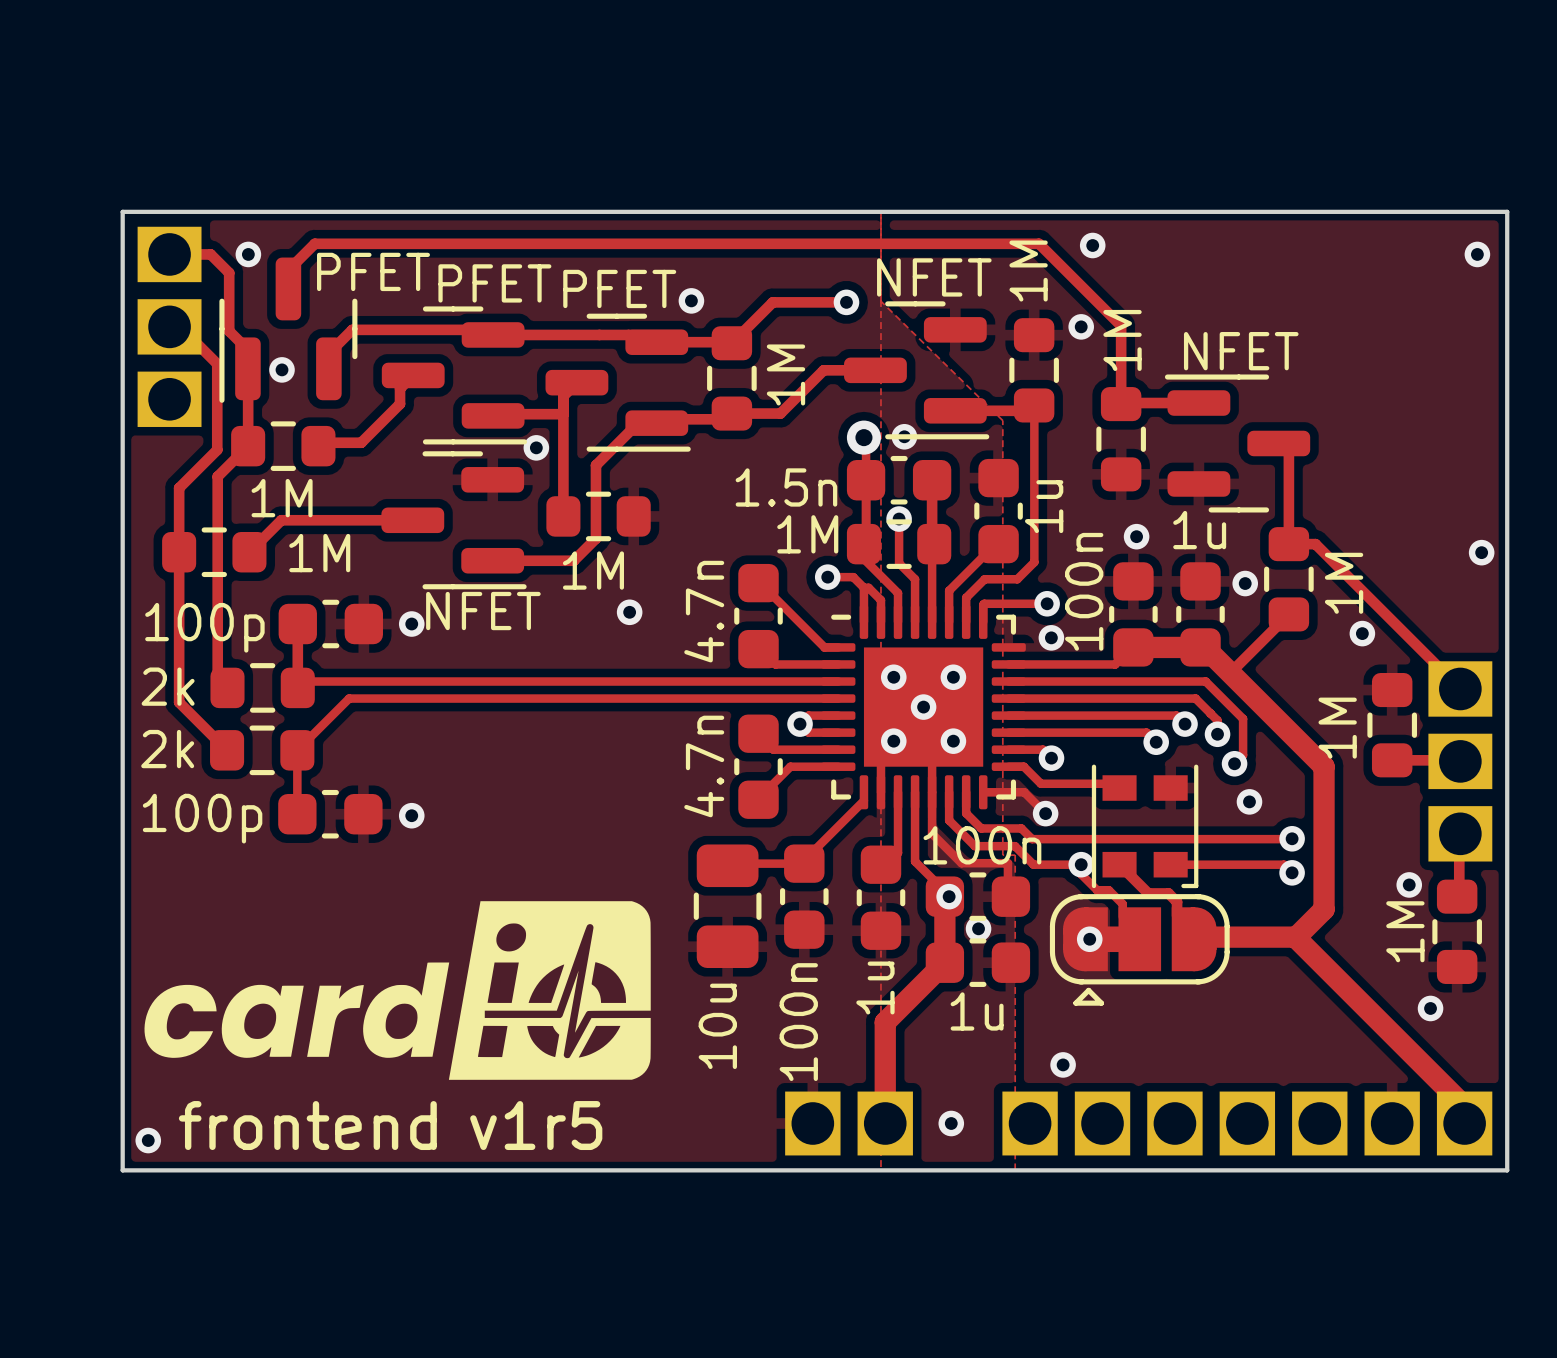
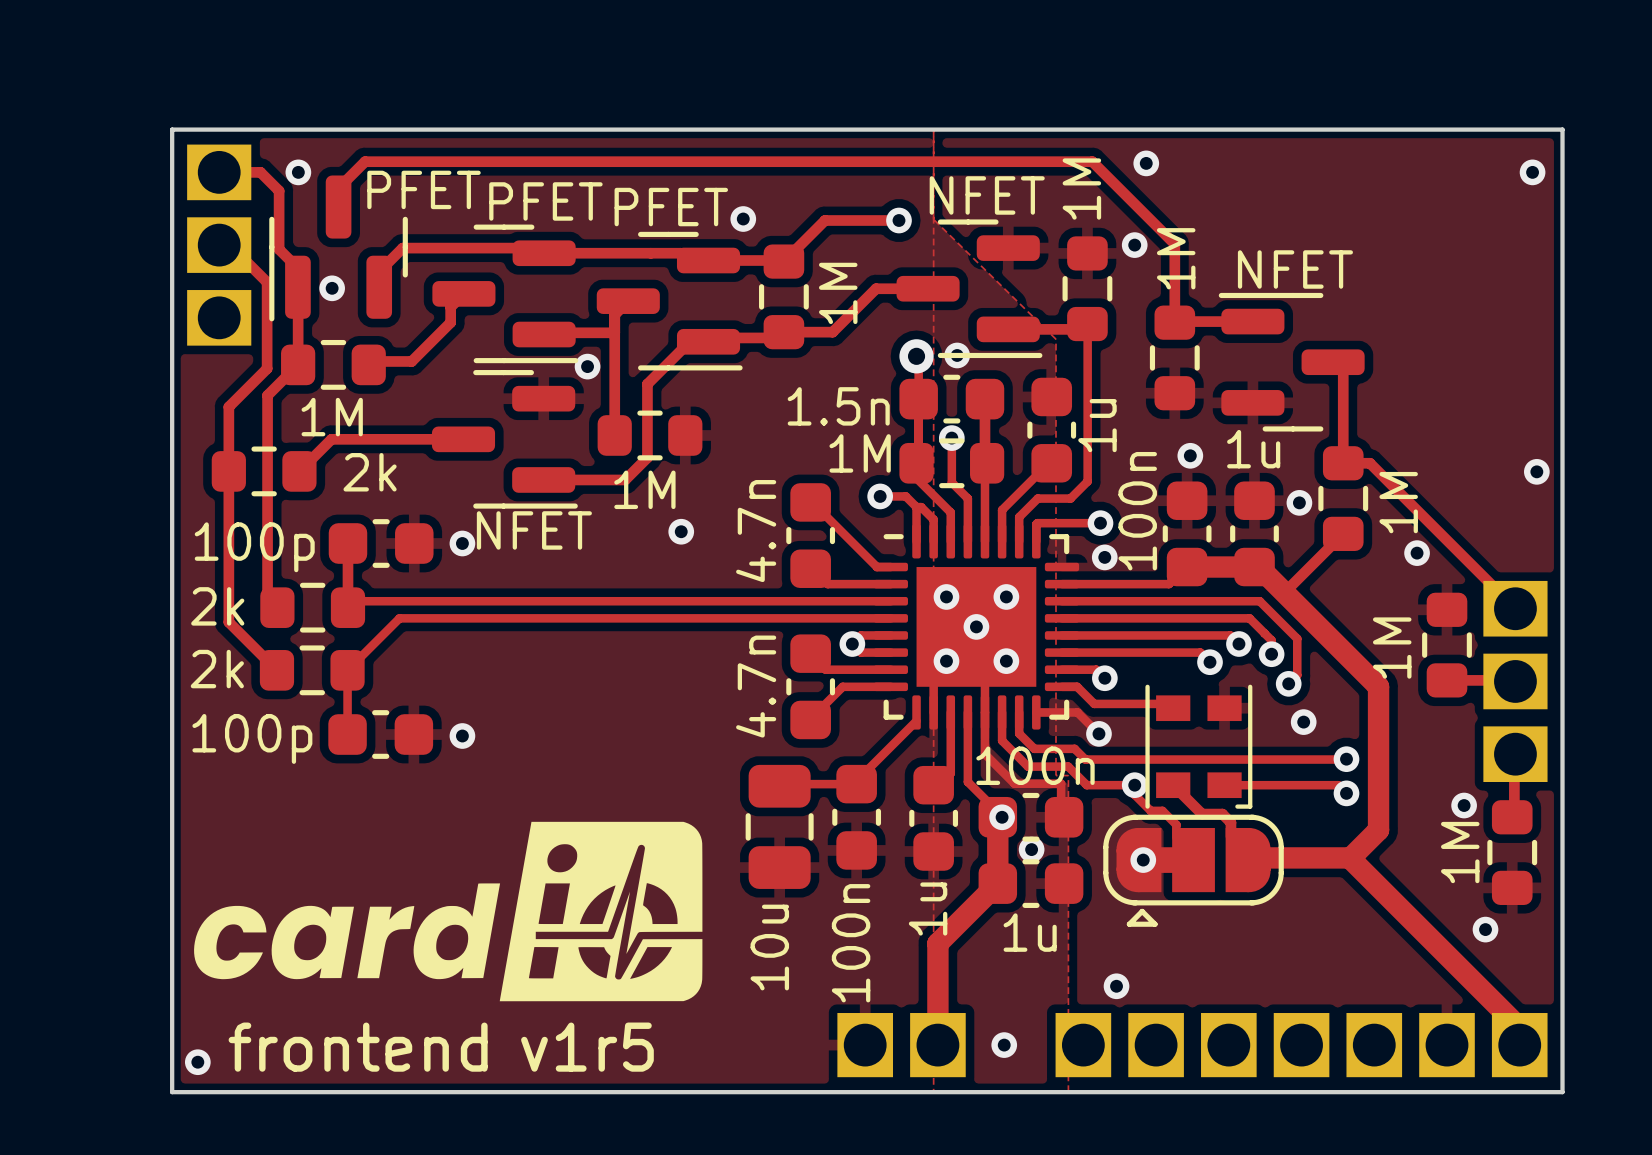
part value: 1M (319, 553) -> 2k (370, 472)

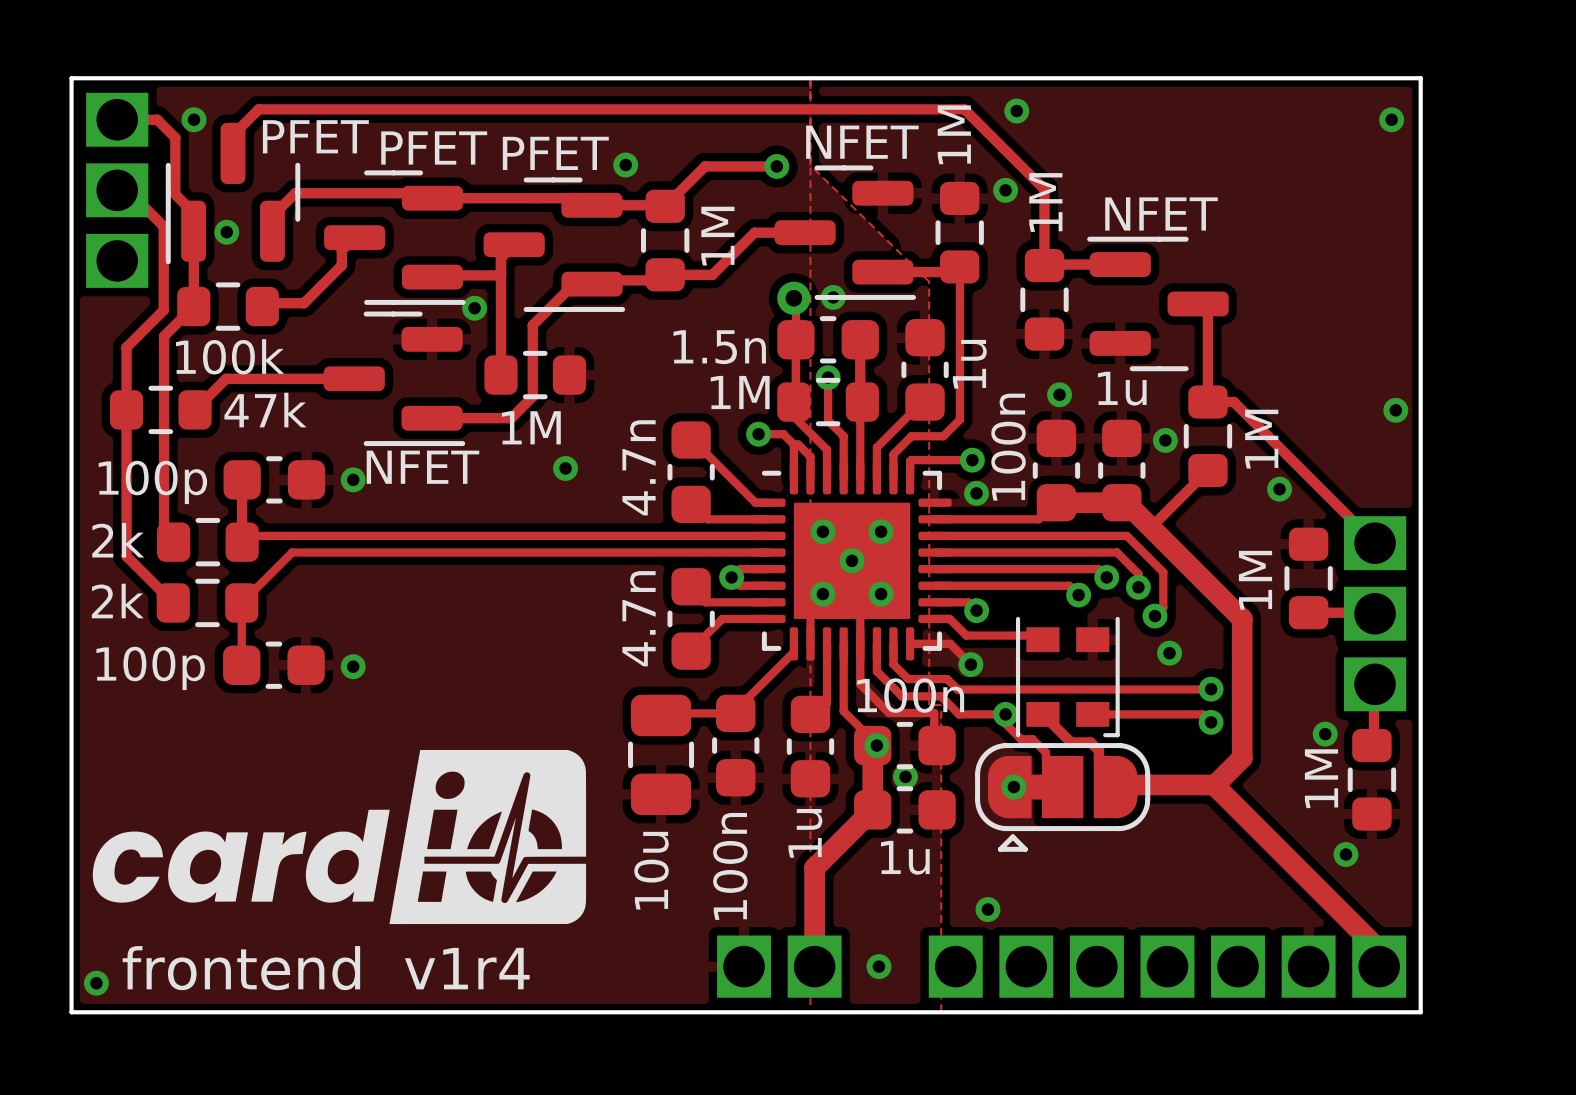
part value: 1M (332, 417) -> 100k (230, 356)
part value: 2k (370, 472) -> 47k (265, 410)
text: v1r5 (587, 1047) -> v1r4 (467, 968)

